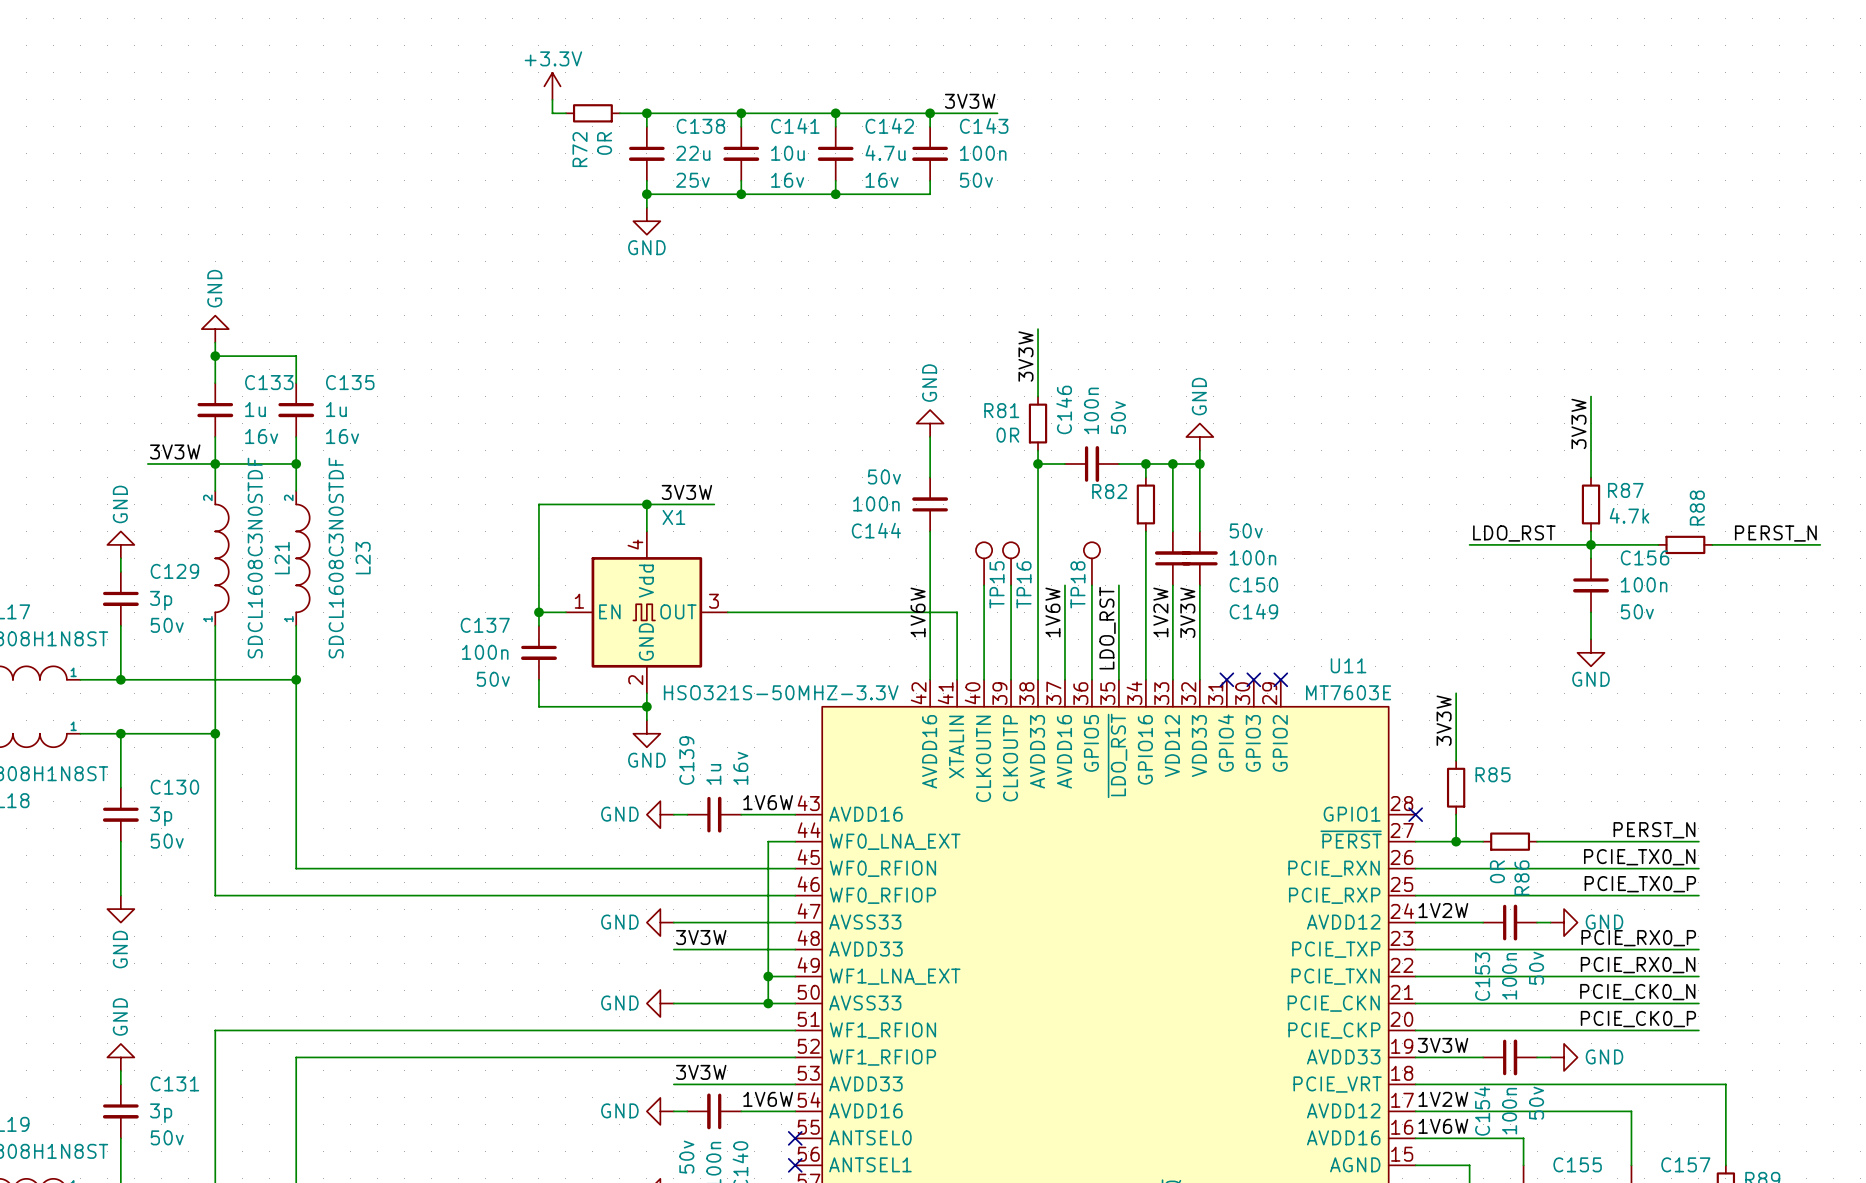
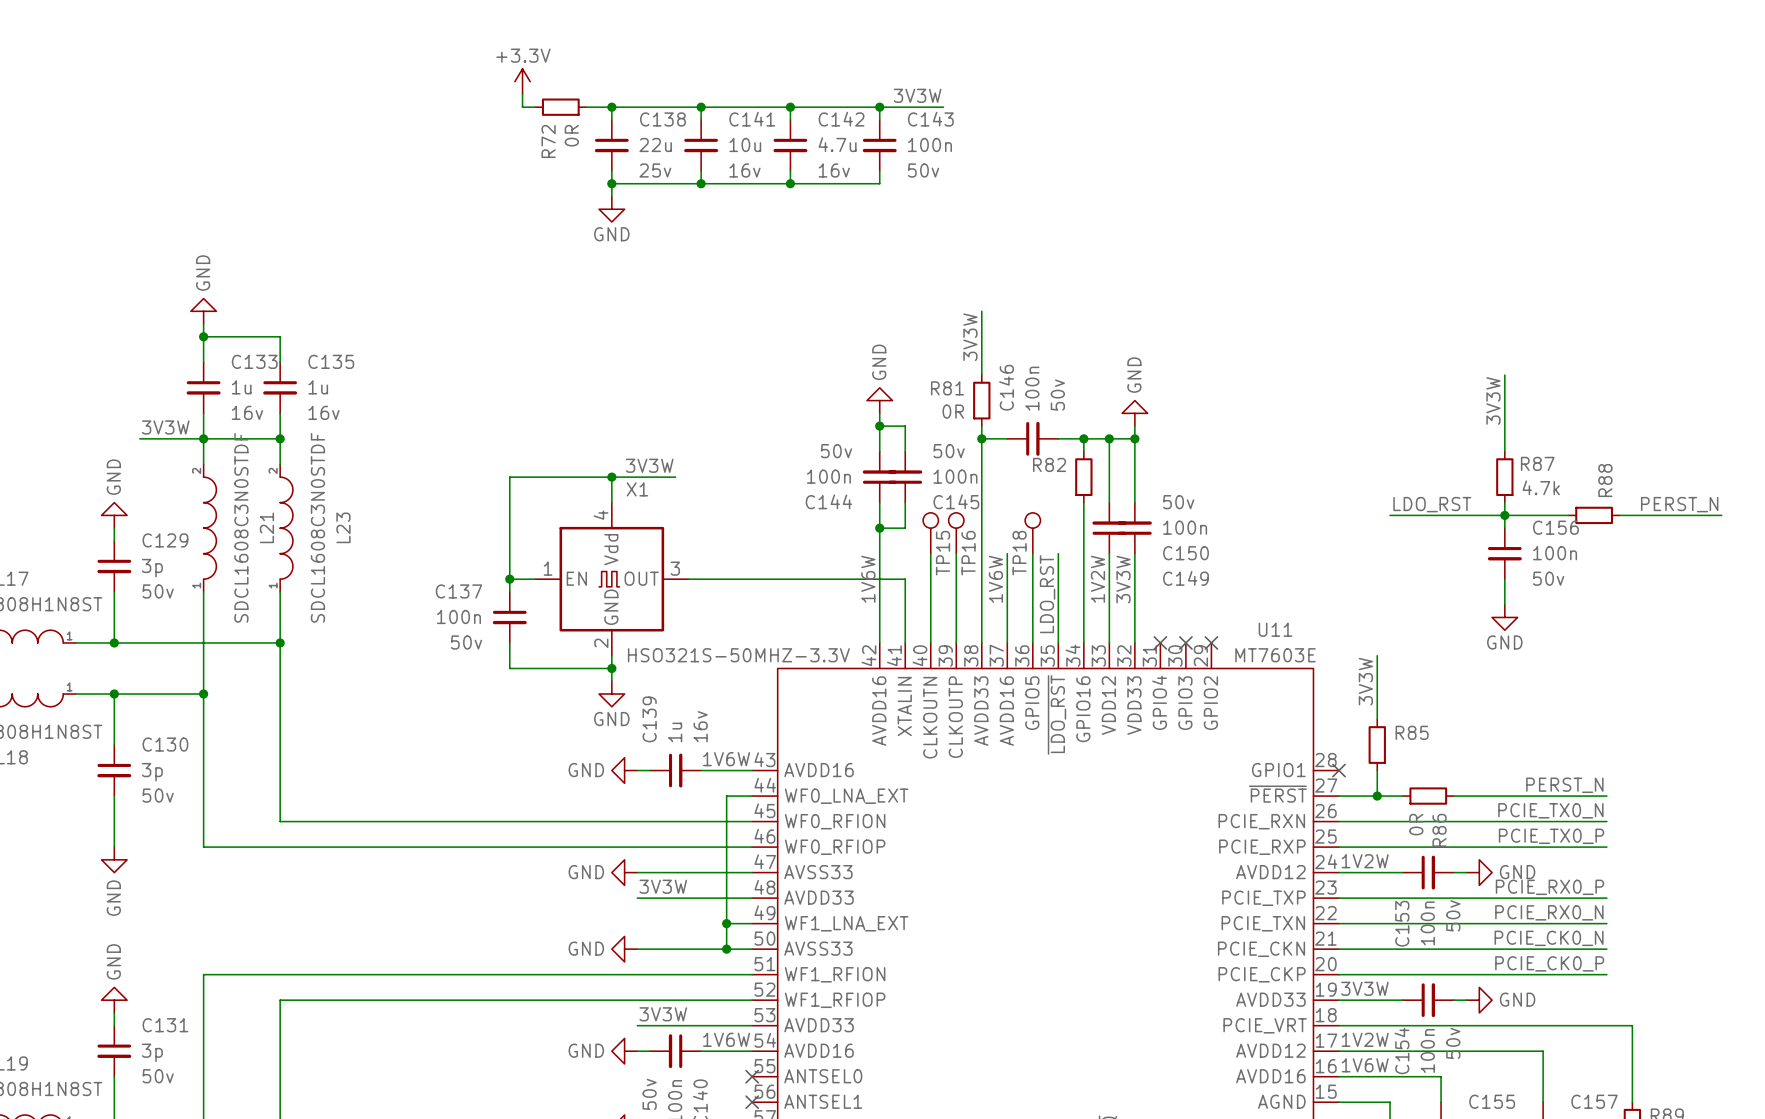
wire: none -> (879, 426) (905, 426) (905, 451)
junction: none -> (879, 426)
C145: none -> 100n (905, 477)
wire: none -> (905, 502) (905, 528) (879, 528)
junction: none -> (879, 528)

